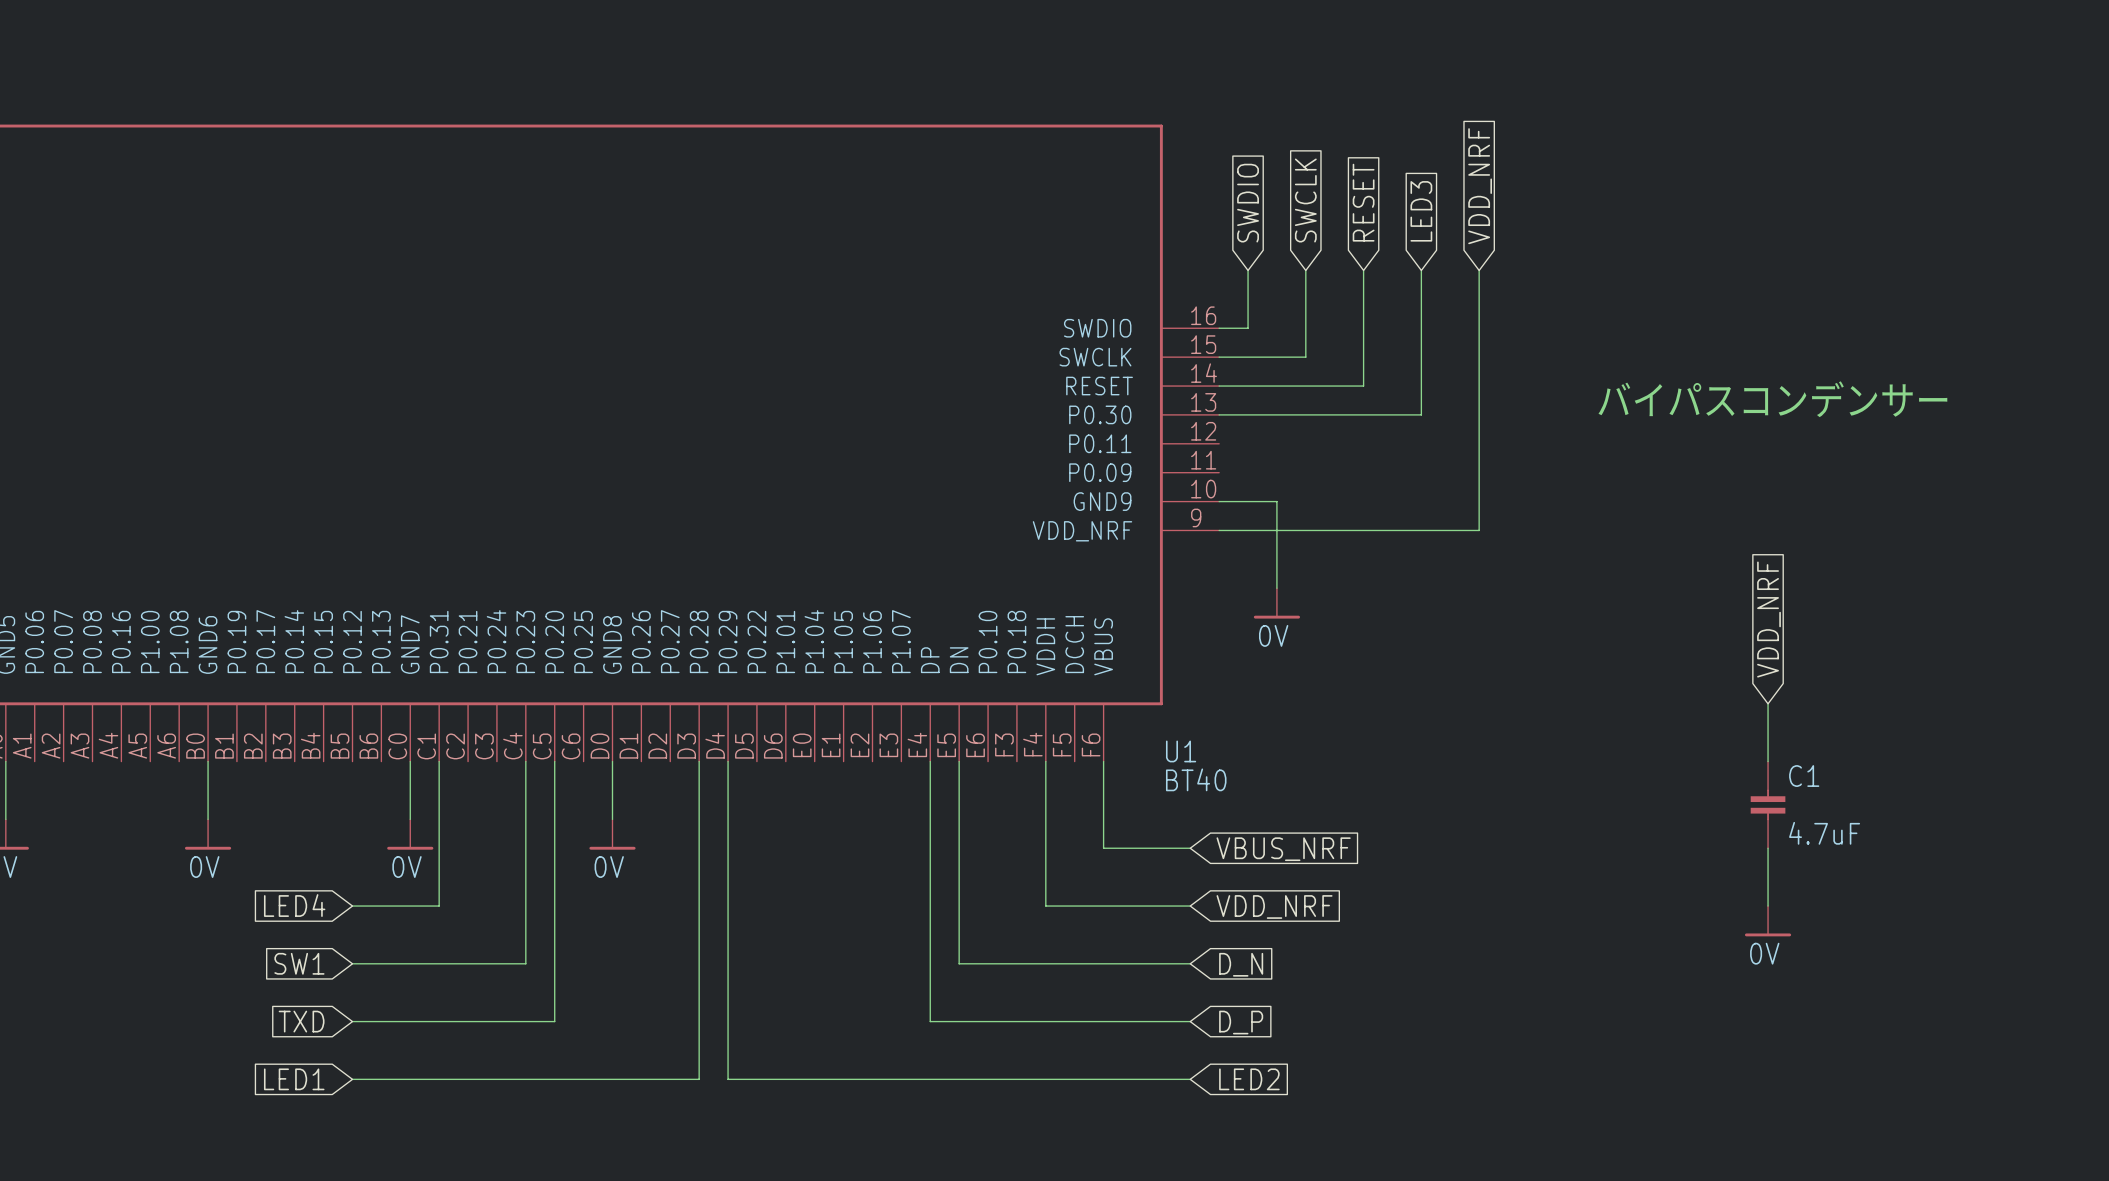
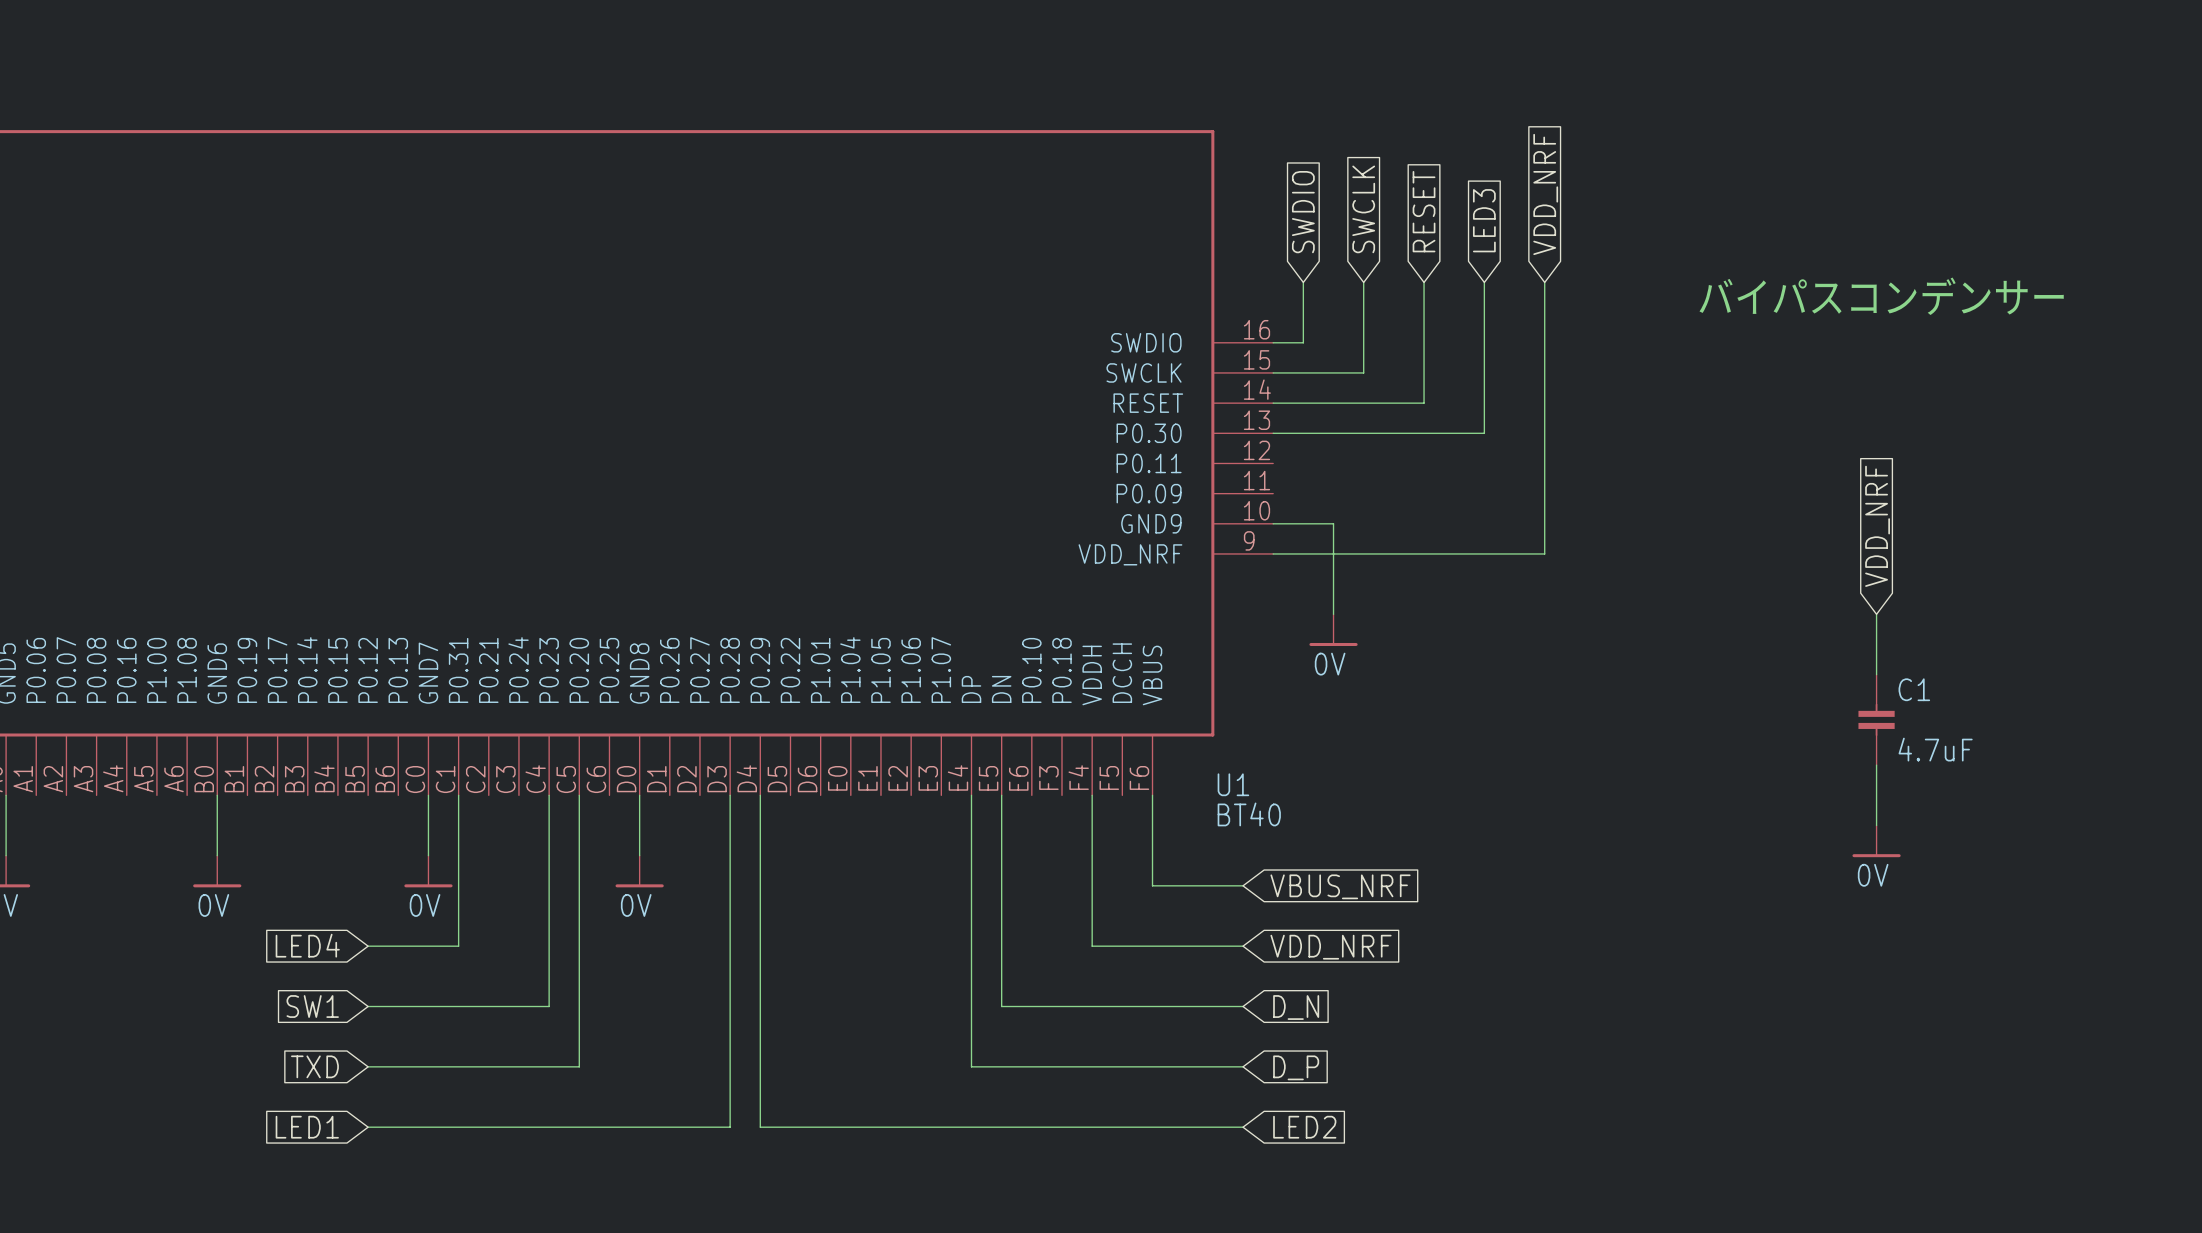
text position: バイパスコンデンサー (1772, 399) -> バイパスコンデンサー (1881, 296)
global label position: VDD_NRF (1768, 619) -> VDD_NRF (1877, 526)
wire: (1768, 703) (1768, 761) -> (1876, 765) (1876, 825)
C1 position: (1768, 804) -> (1876, 719)
wire: (1768, 848) (1768, 906) -> (1876, 614) (1876, 674)
power symbol position: 0V (1768, 921) -> 0V (1876, 841)

